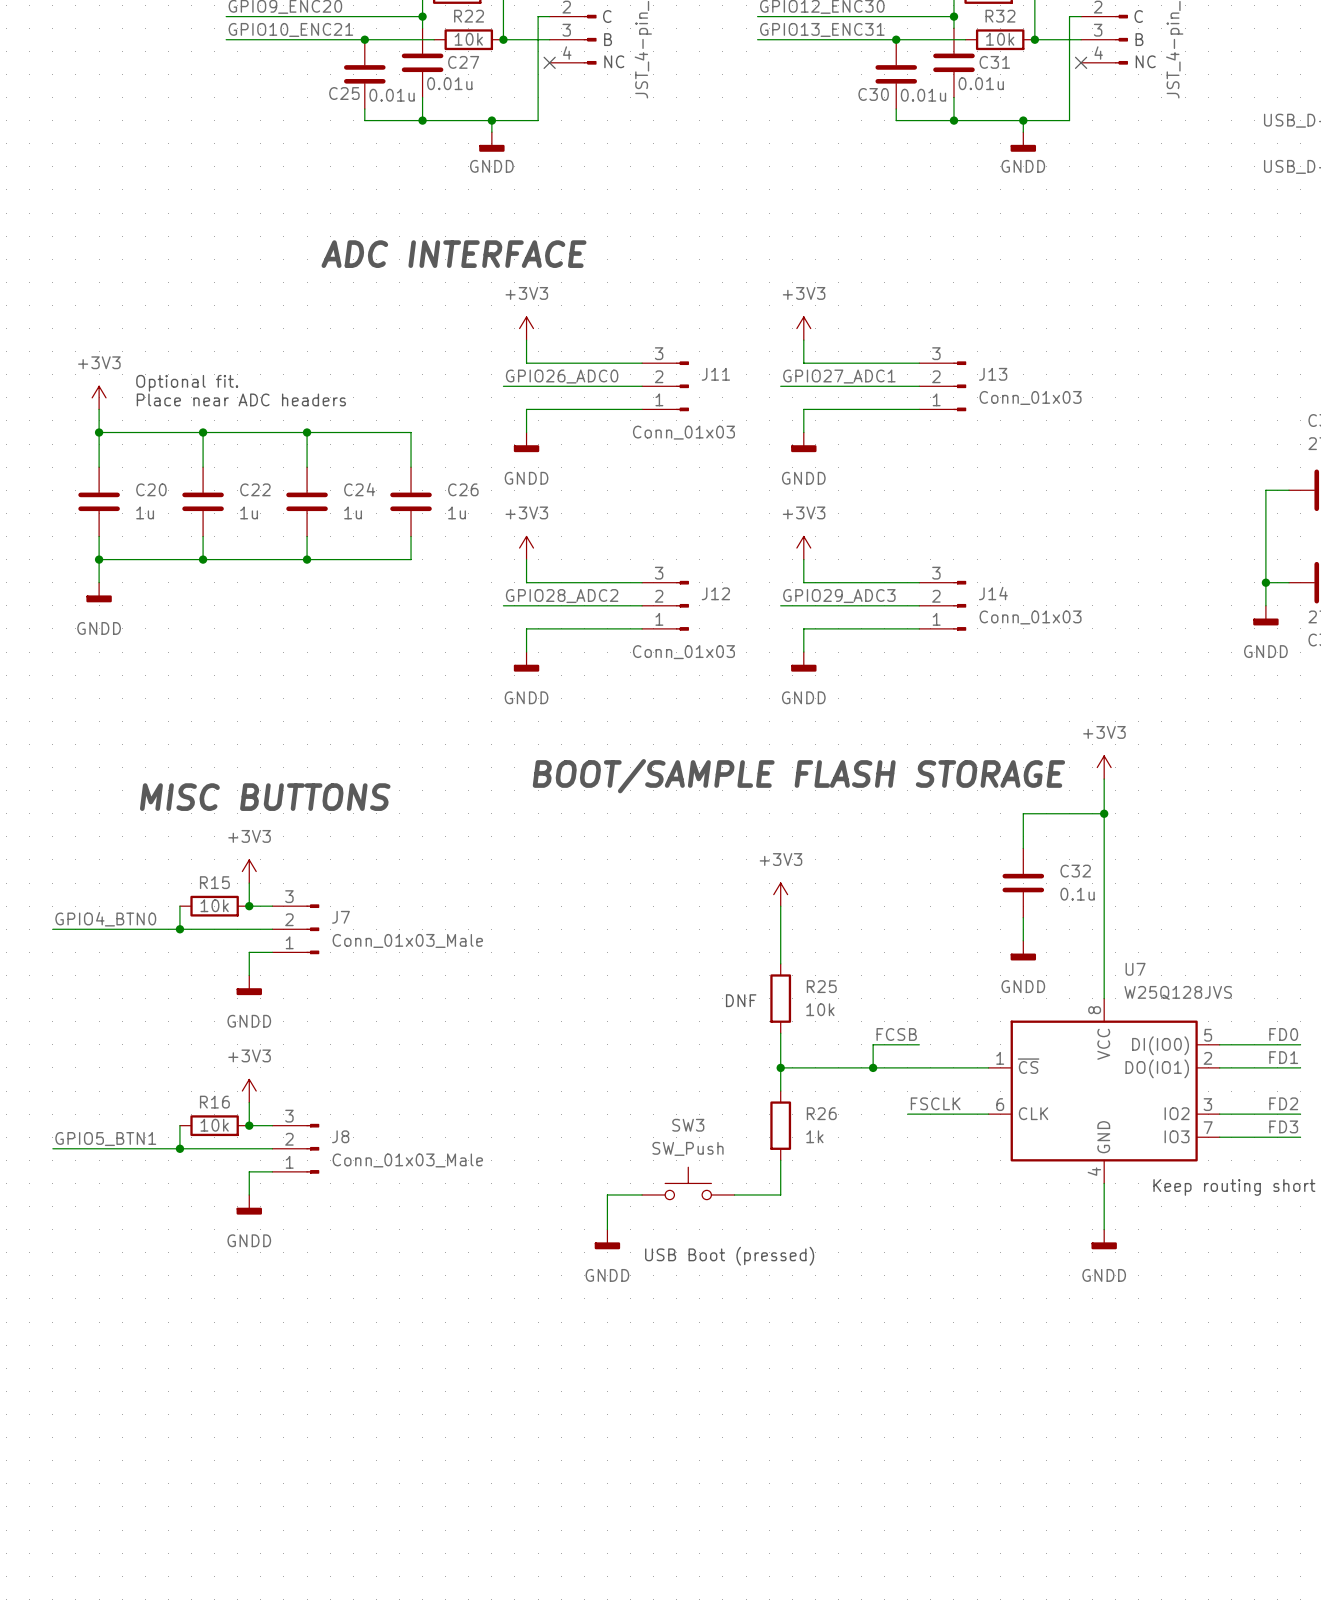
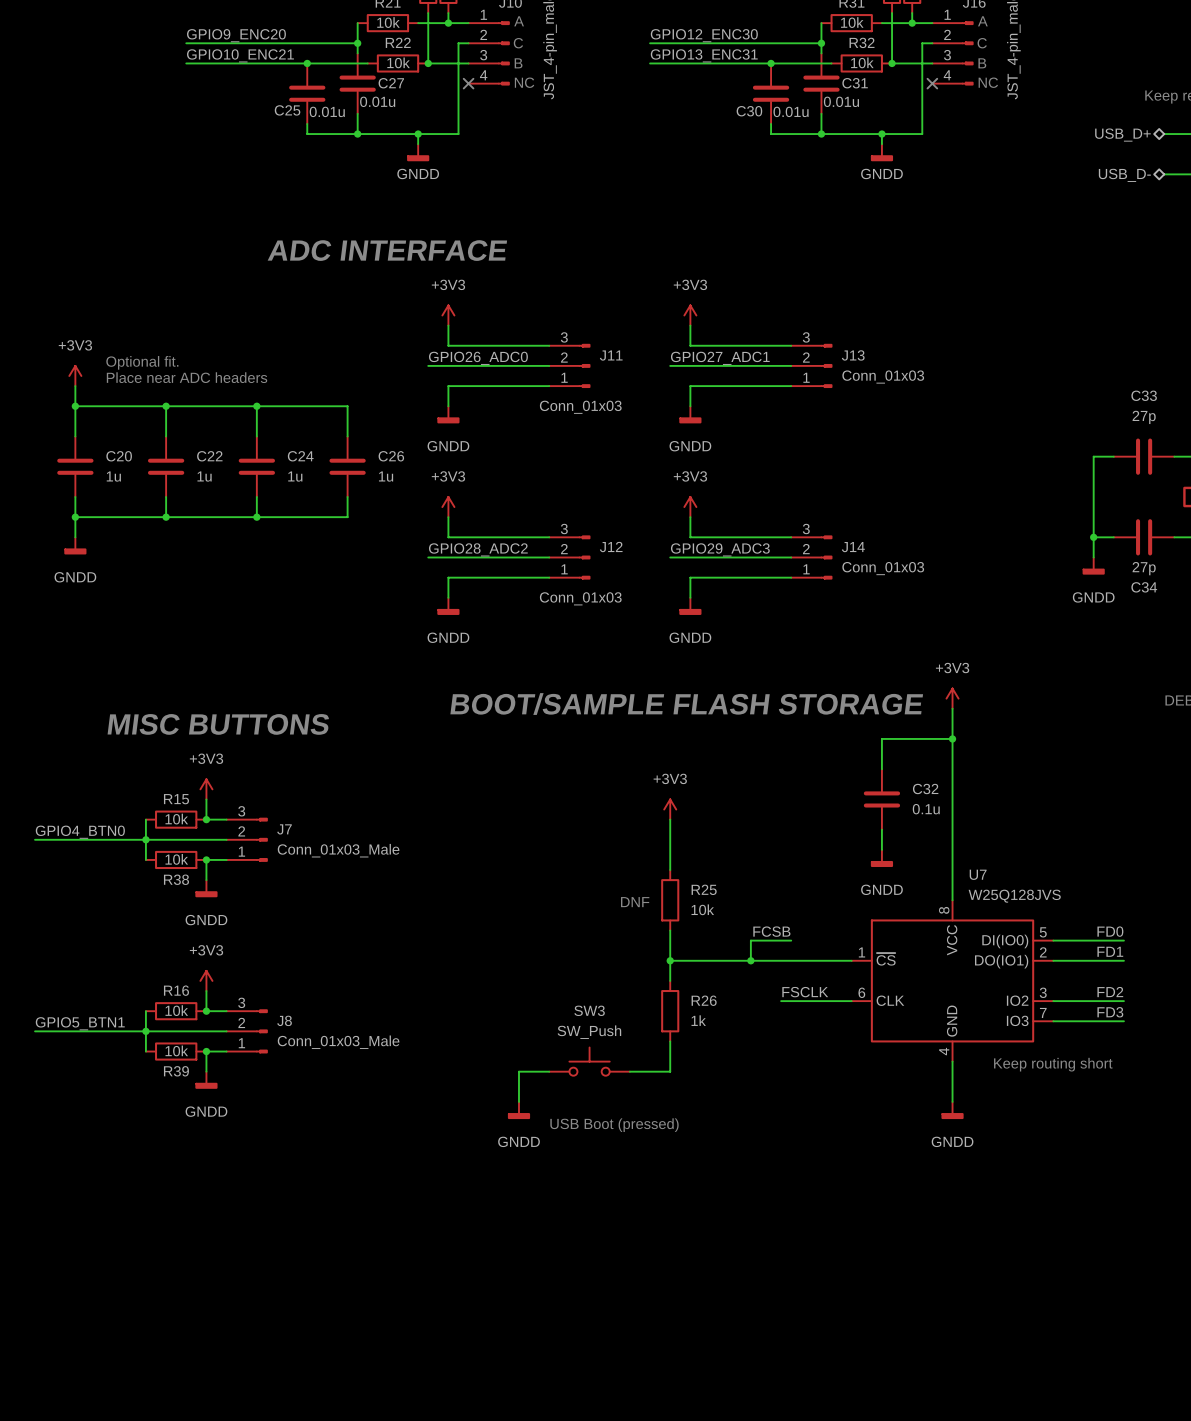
wire: none -> (145, 839) (145, 859)
R38: none -> 10k (176, 859)
junction: none -> (206, 859)
wire: none -> (145, 1031) (145, 1051)
R39: none -> 10k (176, 1051)
junction: none -> (206, 1051)

